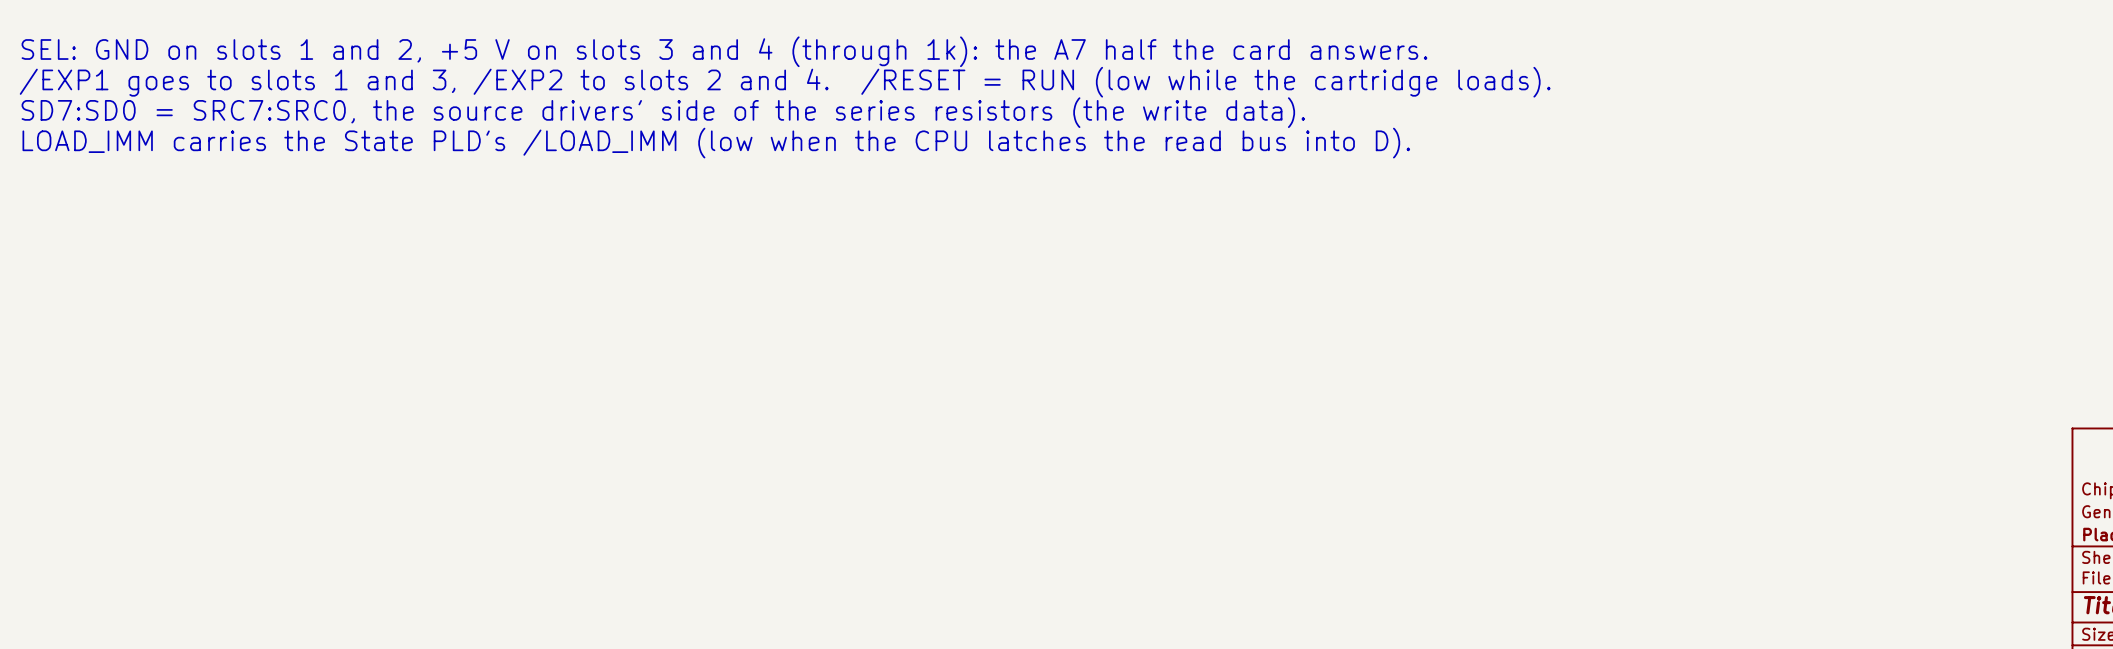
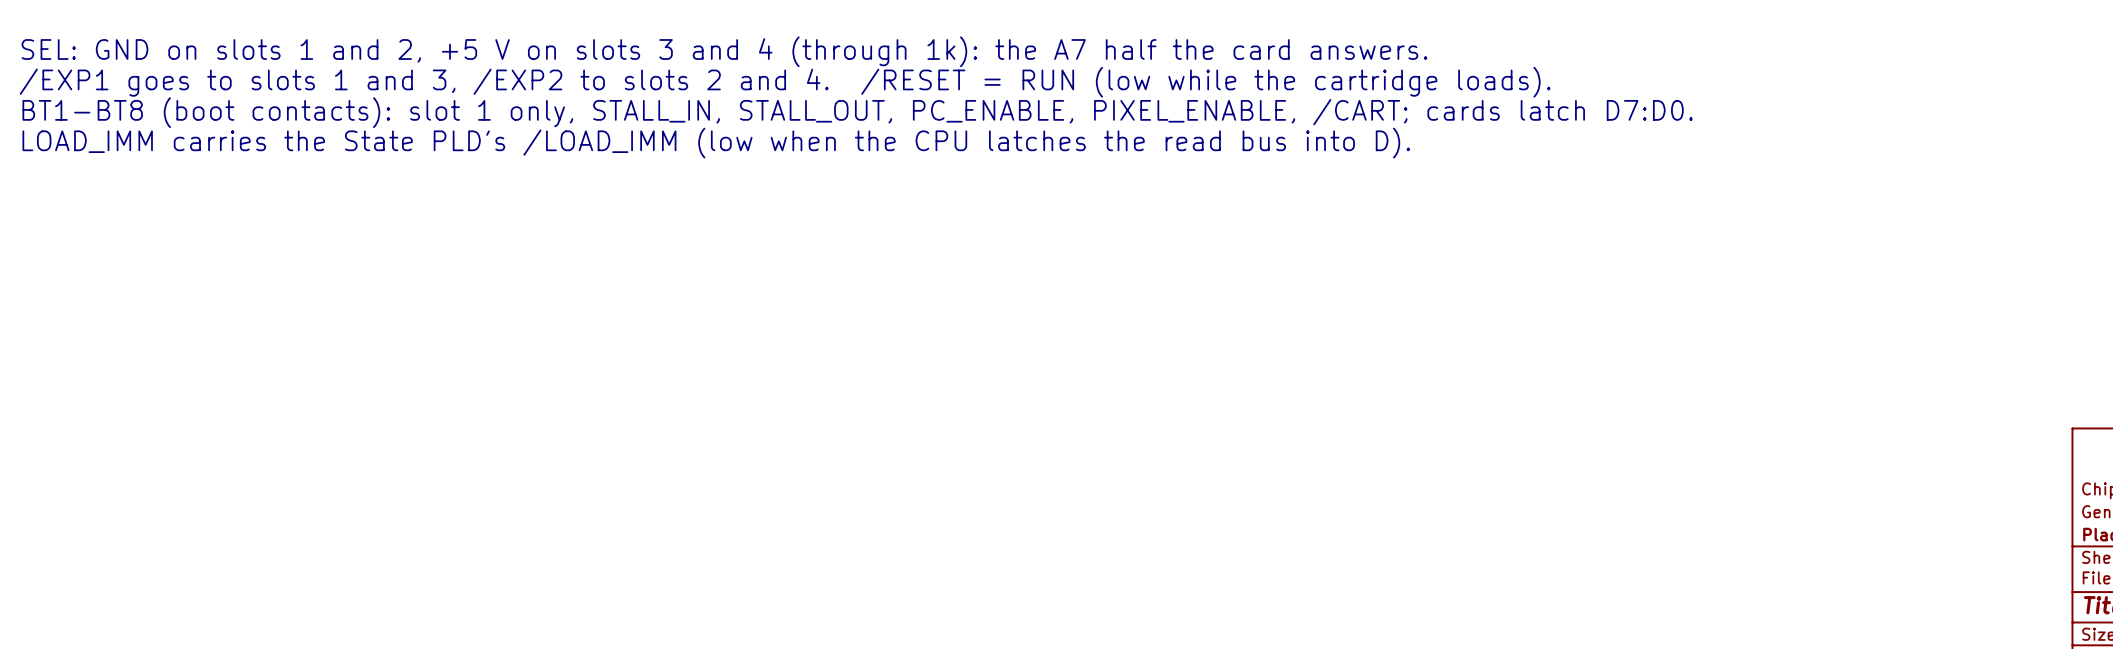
text: SD7:SD0 = SRC7:SRC0, the source drivers' side of the series resistors (the write data). (663, 112) -> BT1-BT8 (boot contacts): slot 1 only, STALL_IN, STALL_OUT, PC_ENABLE, PIXEL_ENABLE, /CART; cards latch D7:D0. (857, 112)

